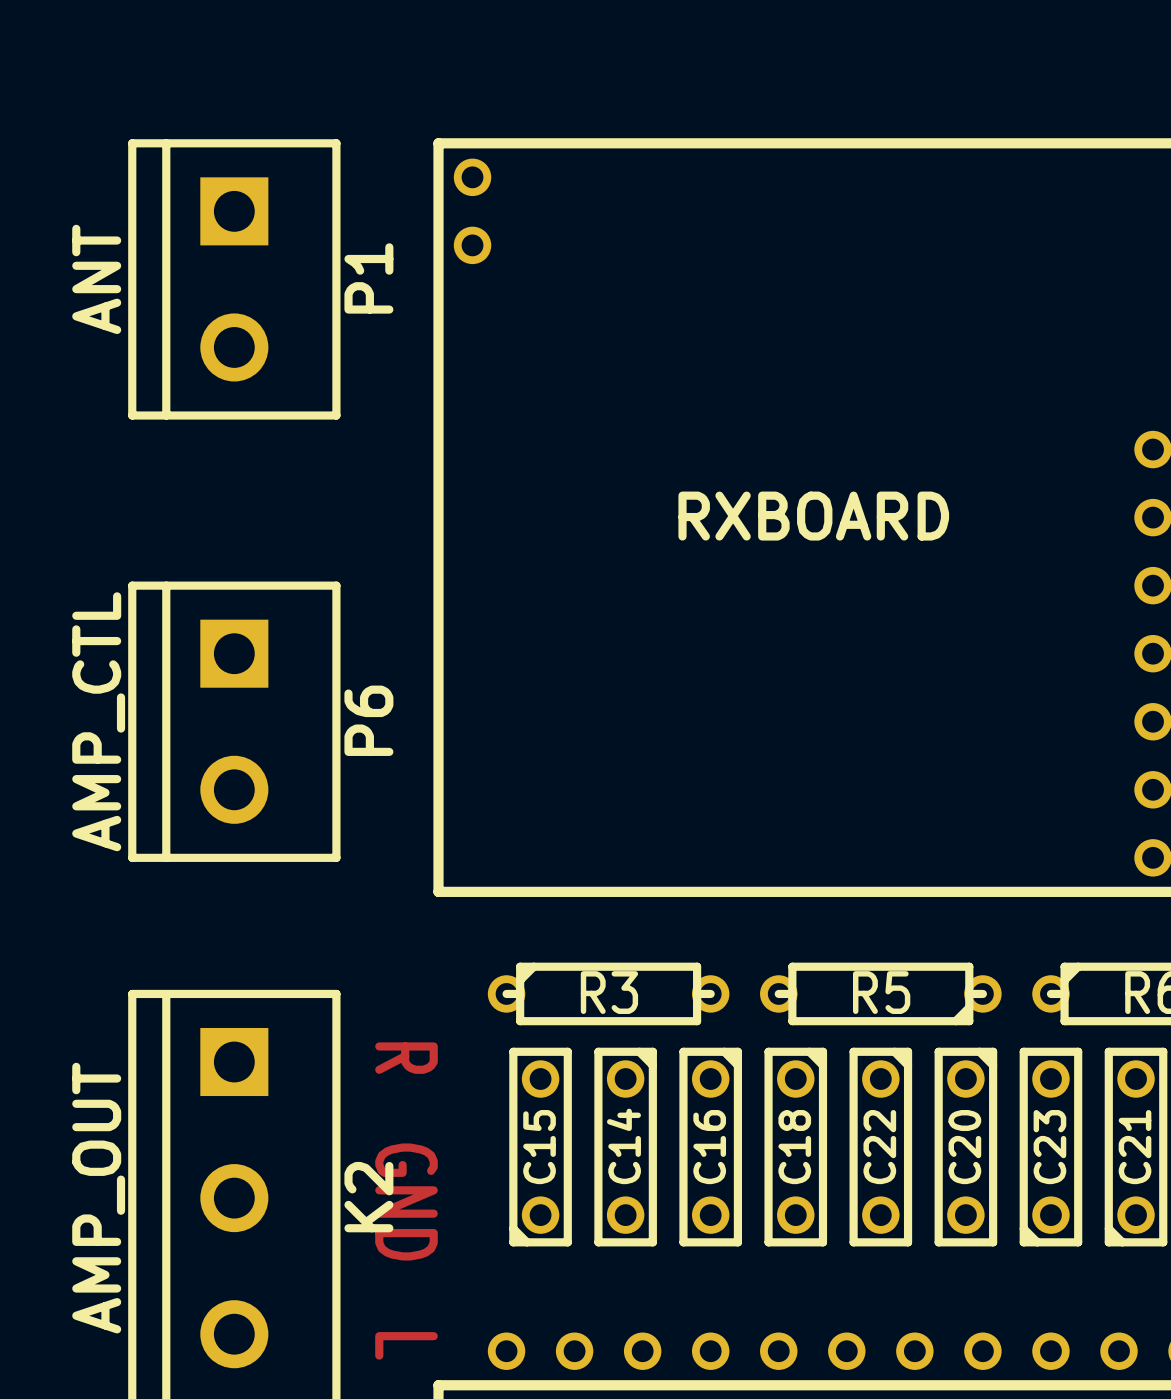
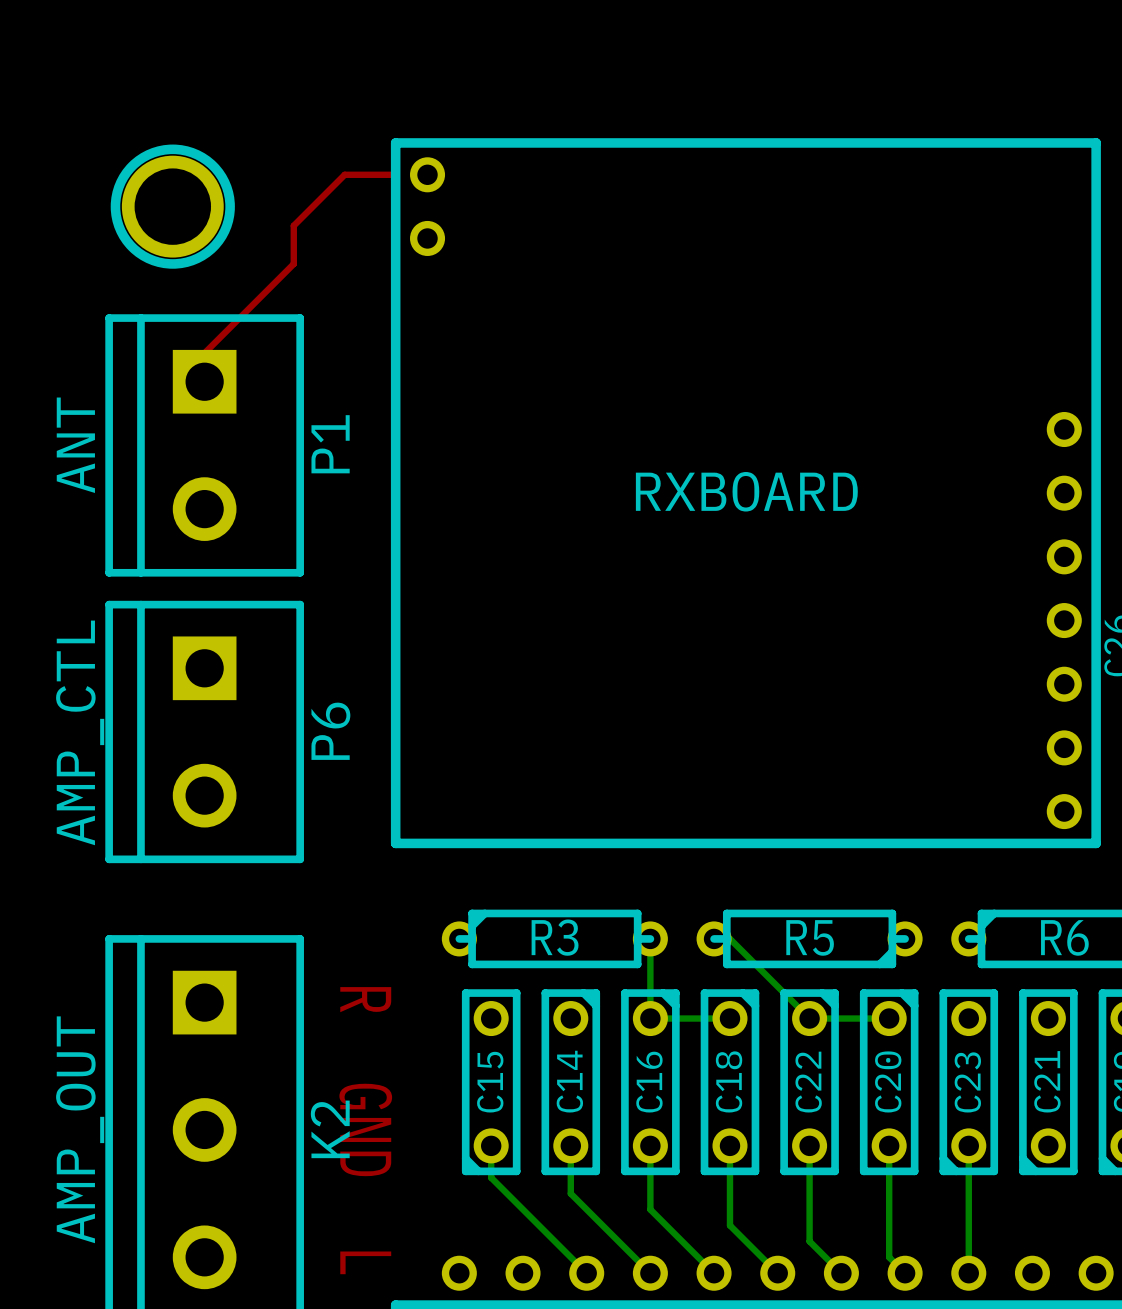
top track: none -> (395, 174) (344, 174) (293, 225) (293, 263) (204, 353) (204, 381)
part: none -> (172, 206)
P1 position: (234, 279) -> (204, 445)
P6 position: (234, 721) -> (204, 731)
bottom track: none -> (650, 938) (650, 1018) (729, 1018)
bottom track: none -> (714, 938) (729, 938) (809, 1018) (889, 1018)
bottom track: none -> (491, 1145) (491, 1177) (586, 1273)
bottom track: none -> (570, 1145) (570, 1193) (650, 1273)
bottom track: none -> (650, 1145) (650, 1209) (714, 1273)
bottom track: none -> (729, 1145) (729, 1225) (777, 1273)
bottom track: none -> (809, 1145) (809, 1241) (841, 1273)
bottom track: none -> (889, 1145) (889, 1257) (905, 1273)
bottom track: none -> (968, 1145) (968, 1273)

